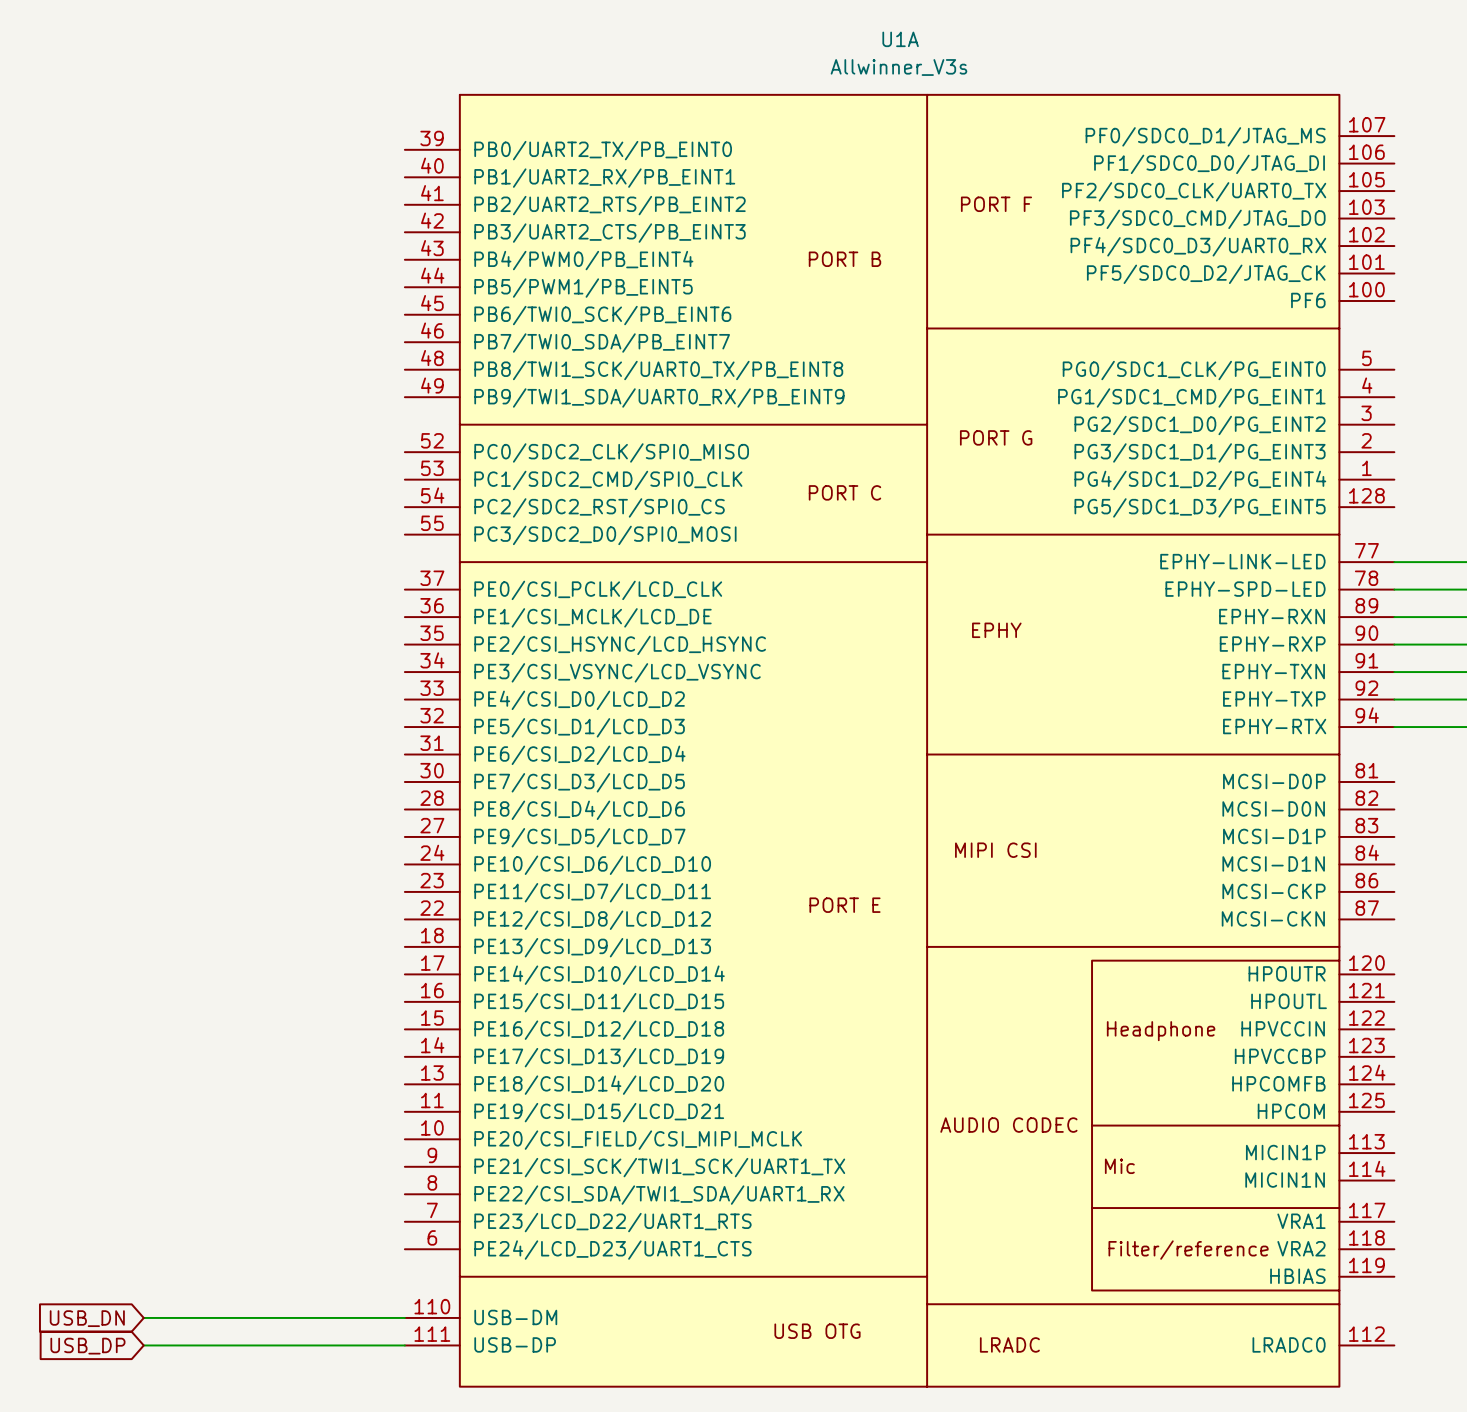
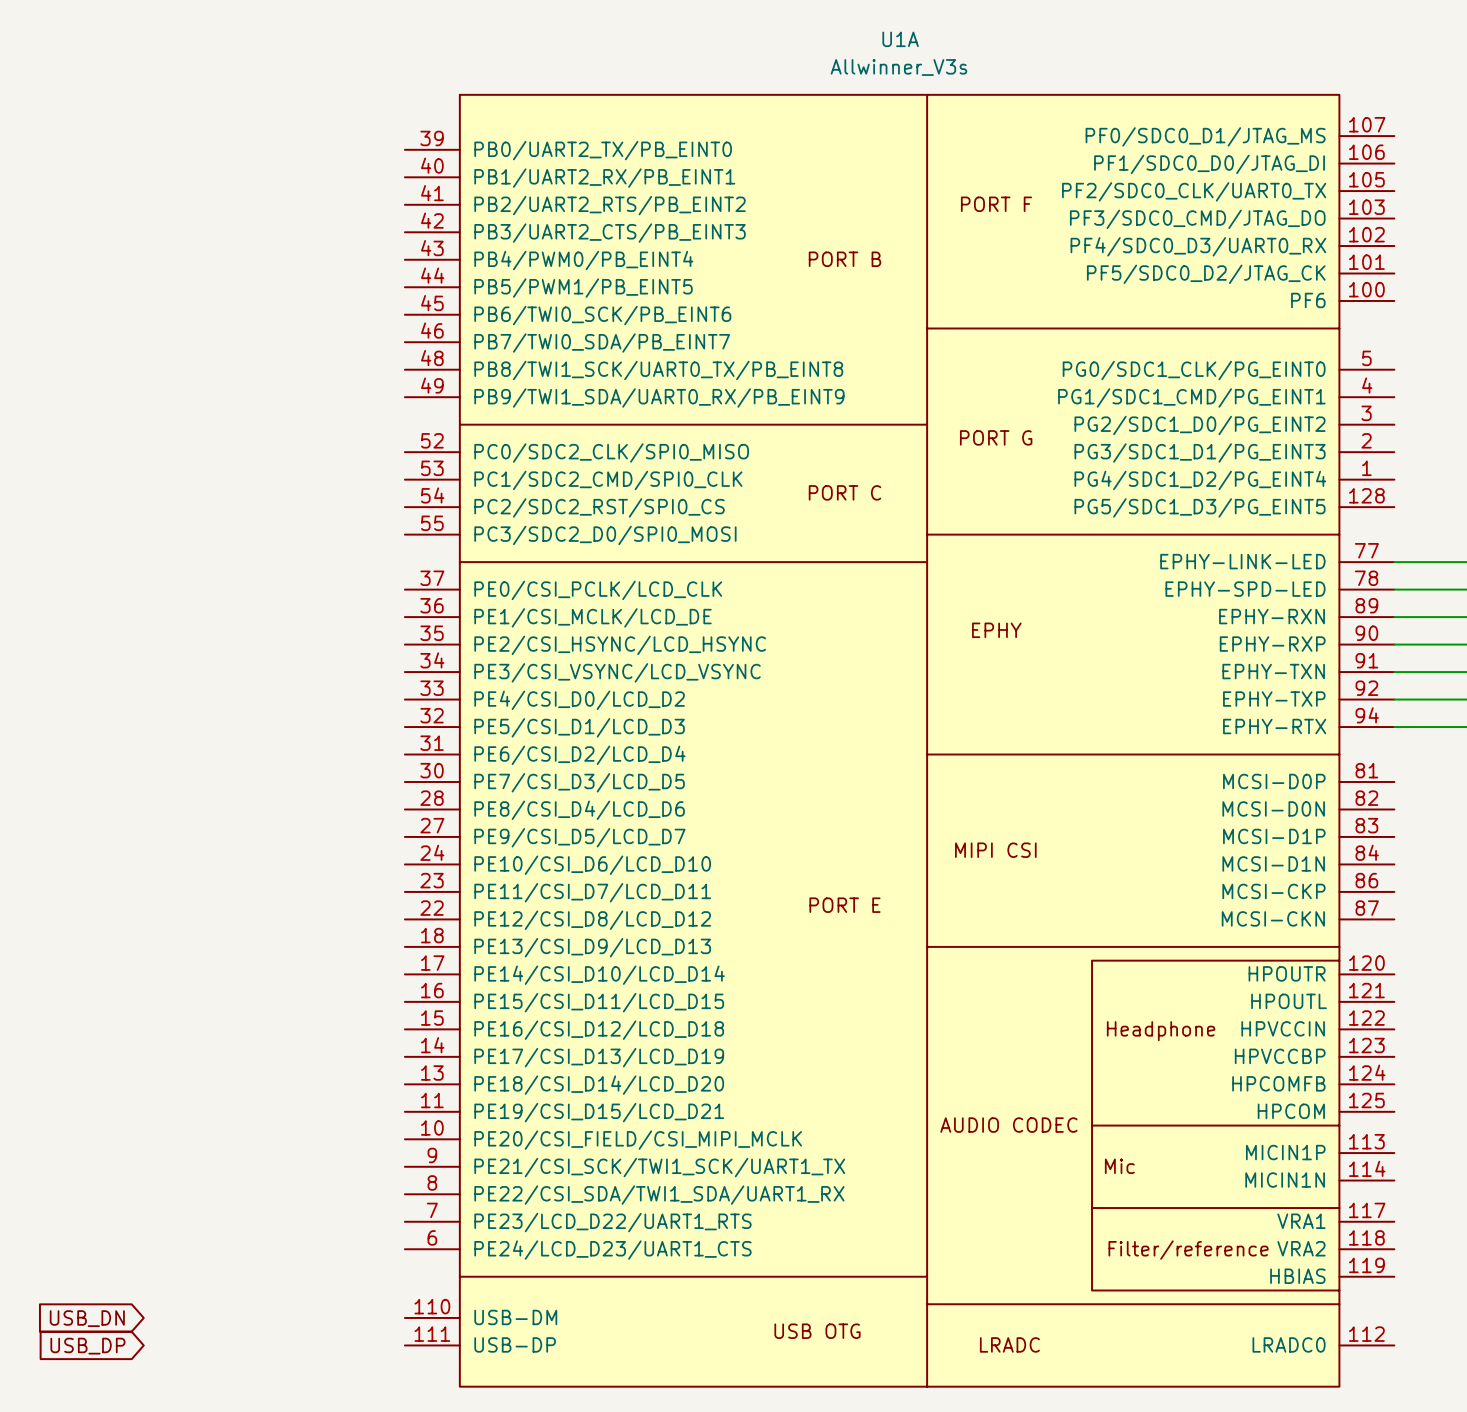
wire: (143, 1317) (404, 1317) -> none
wire: (143, 1345) (404, 1345) -> none

